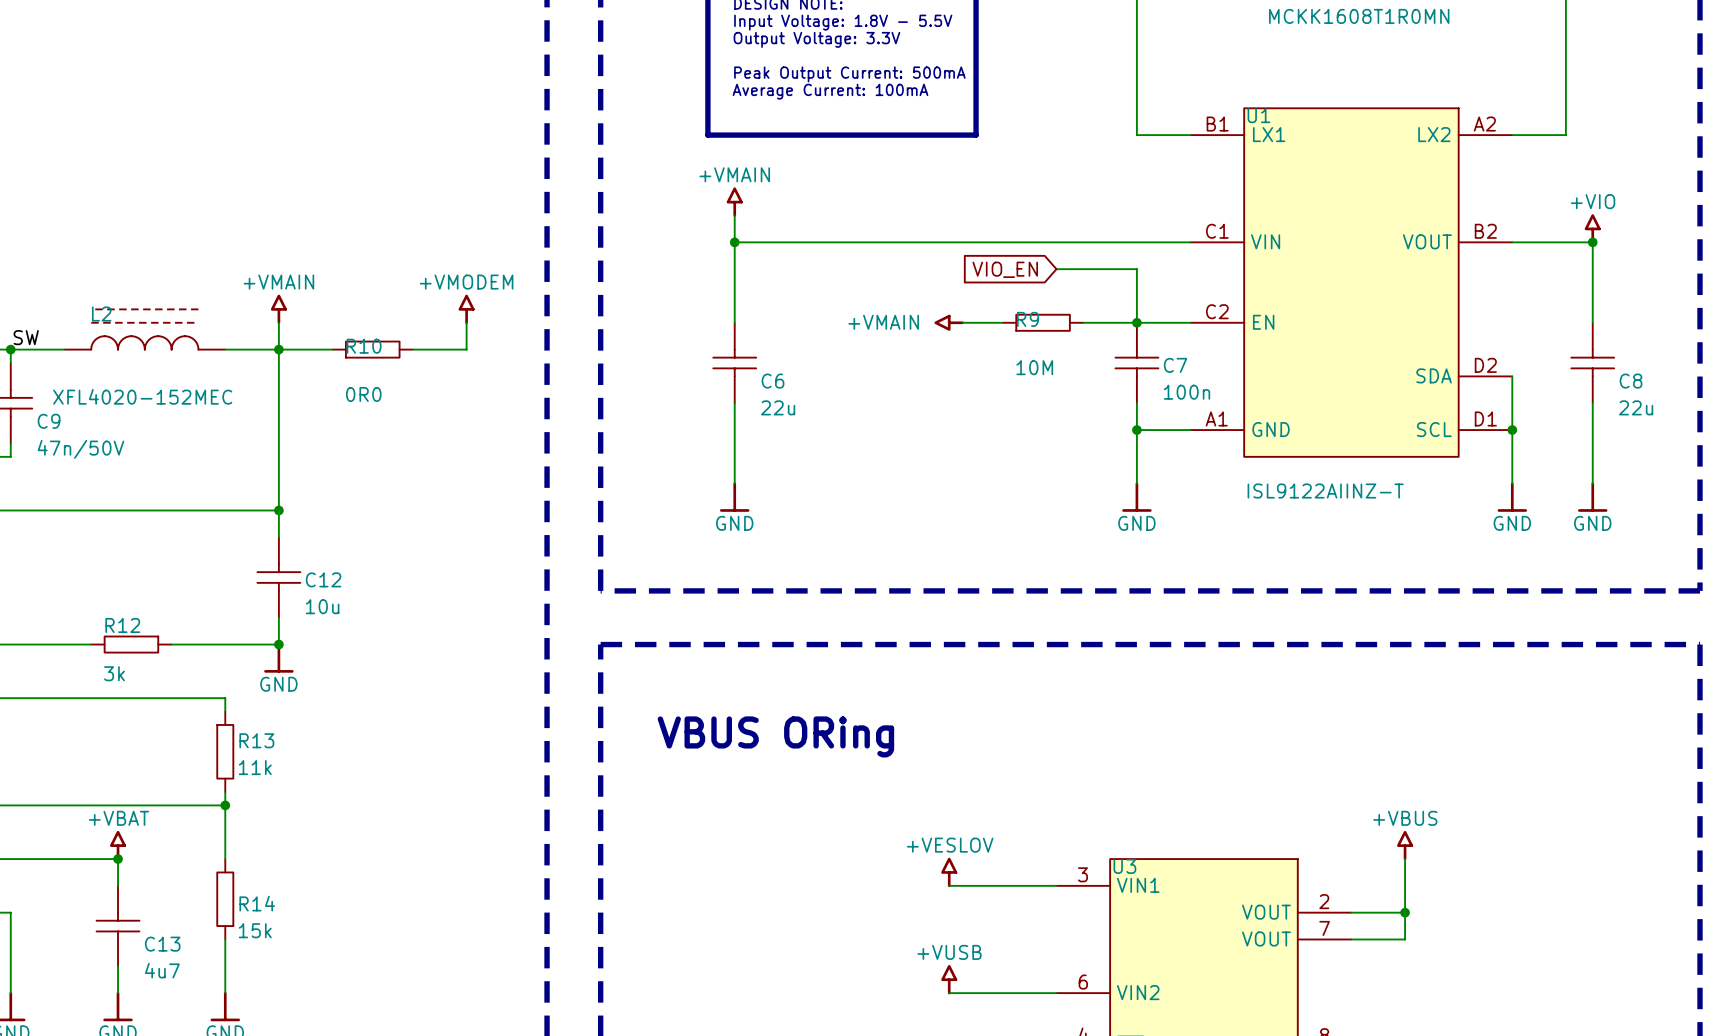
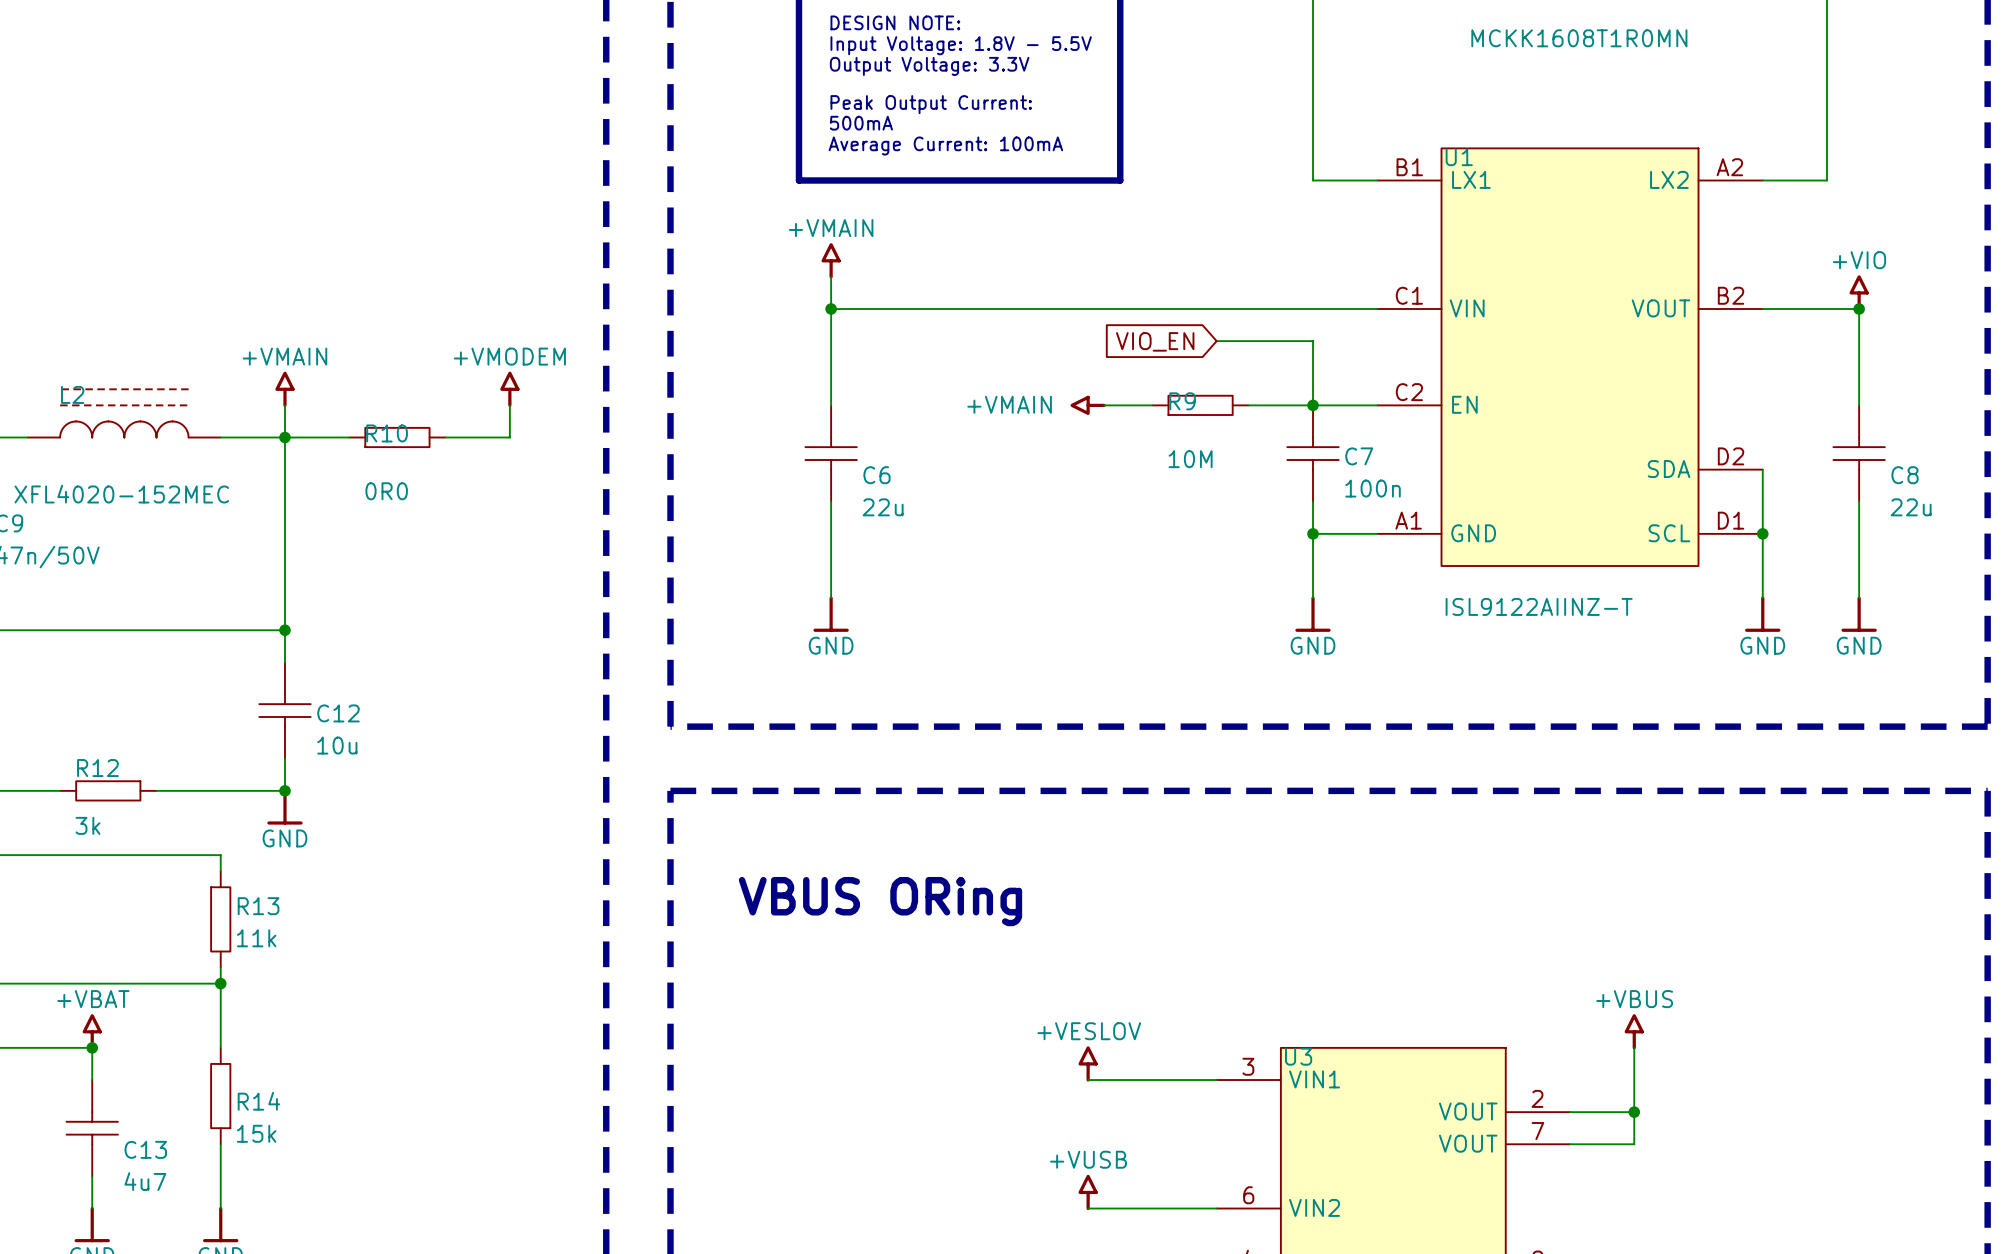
text: Peak Output Current: 500mA (849, 74) -> Peak Output Current: (931, 104)
text: Average Current: 100mA (830, 91) -> 500mA (861, 123)
text: none -> Average Current: 100mA (945, 146)

